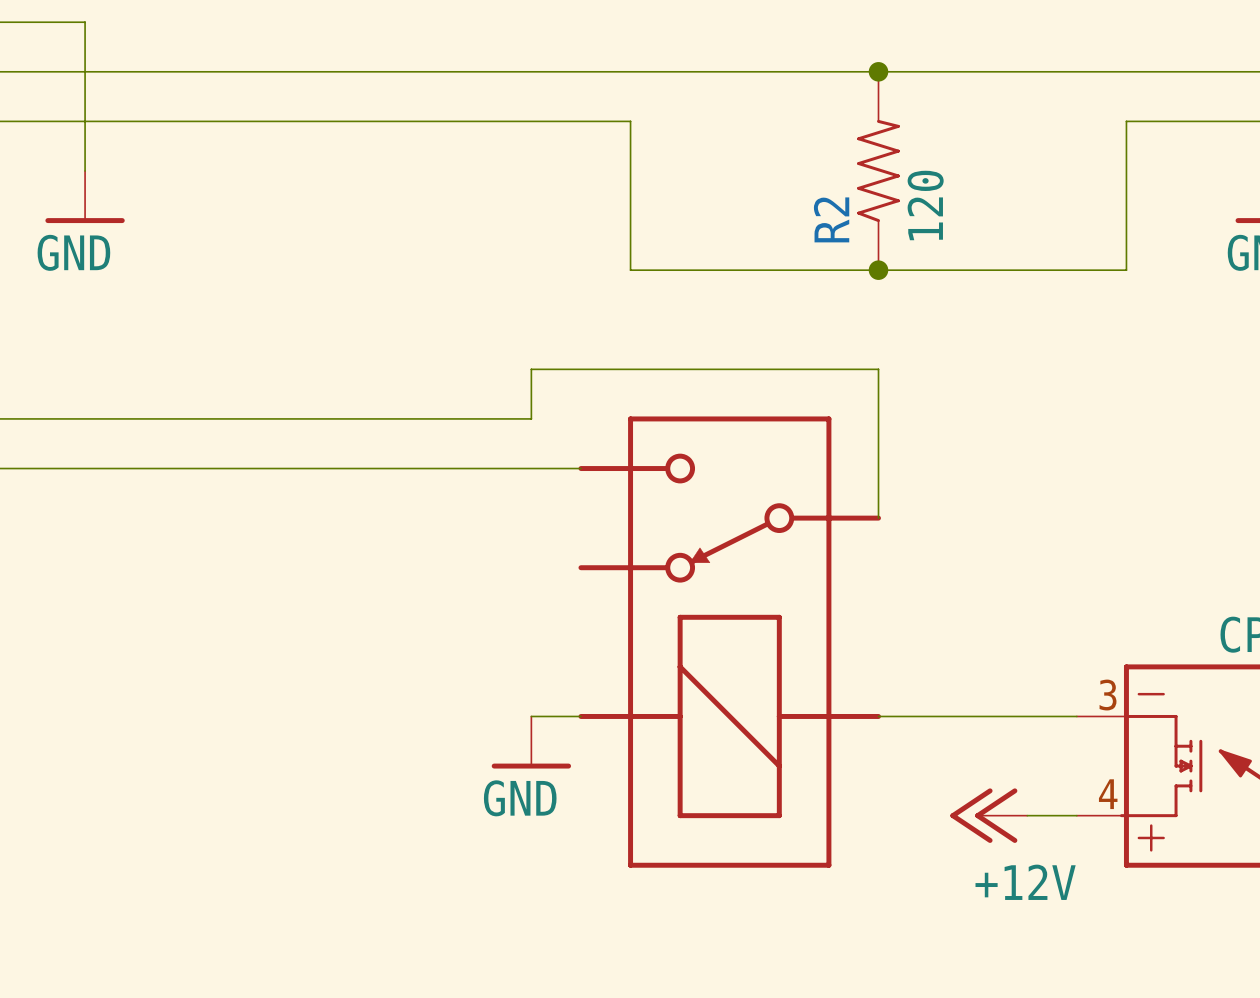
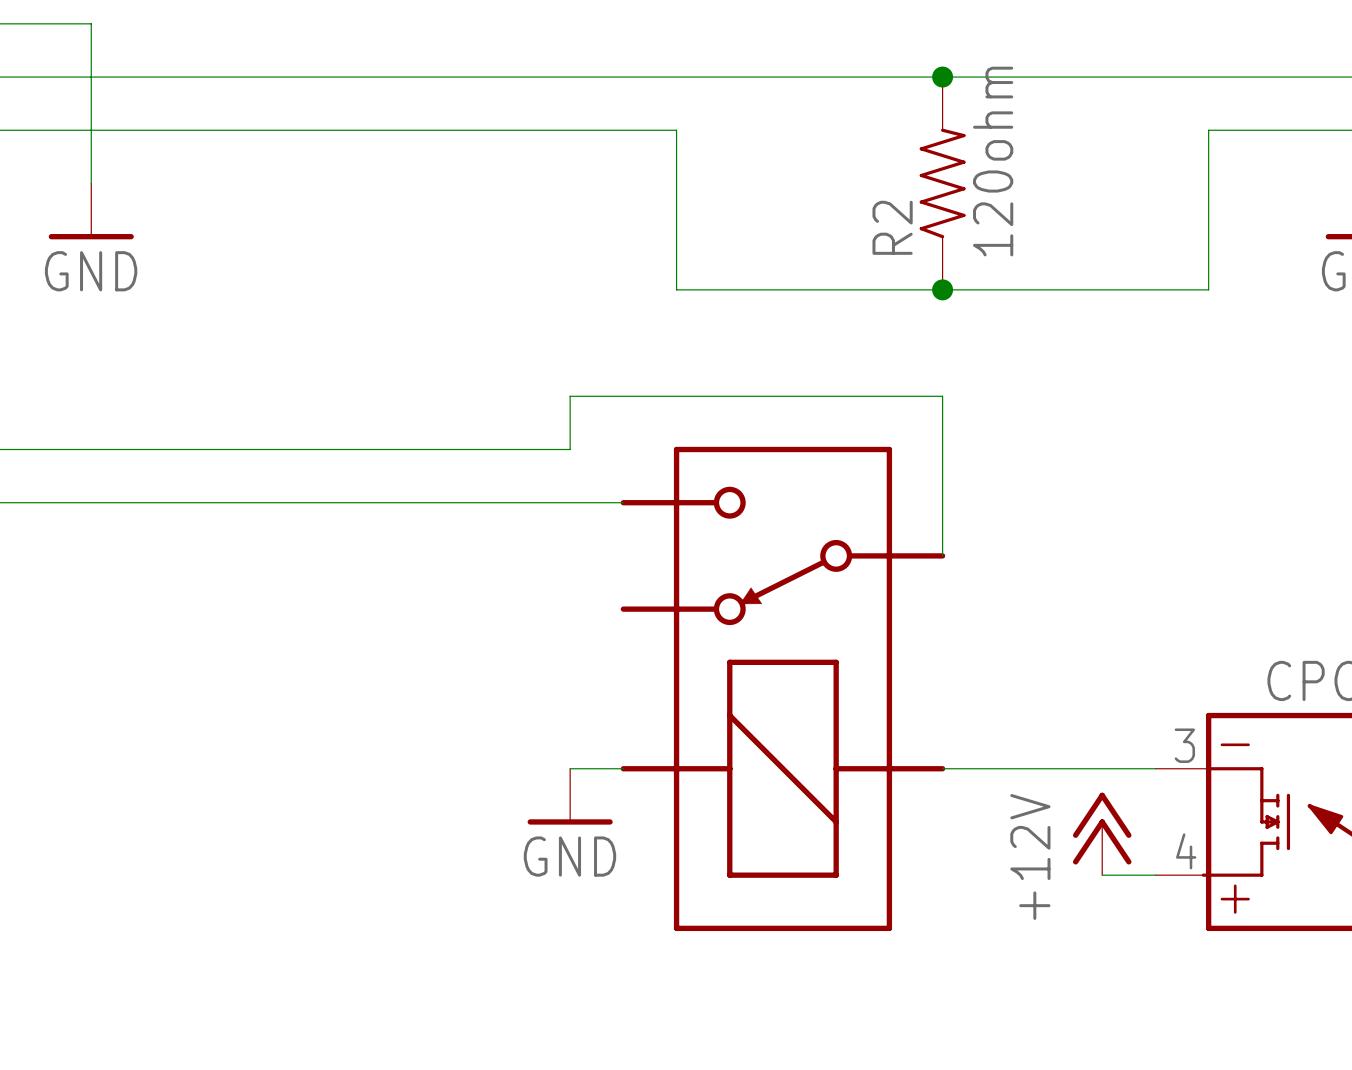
R2 value: 120 (925, 205) -> 120ohm (993, 161)
power symbol rotation: 0° (983, 815) -> 90° clockwise (1102, 828)
power symbol position: +12V (988, 815) -> +12V (1102, 833)

